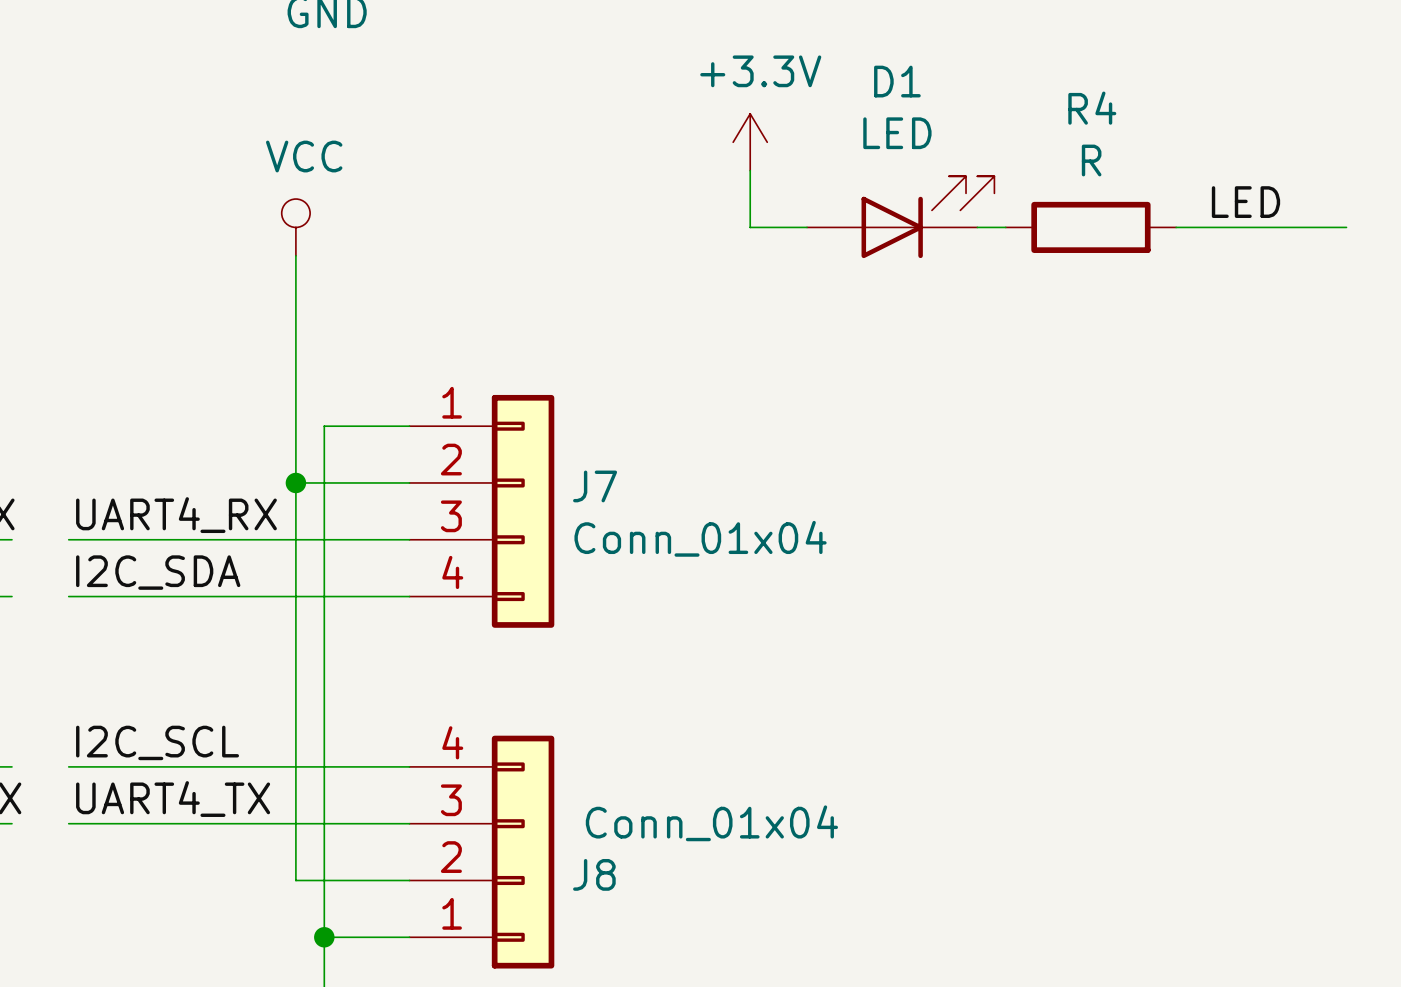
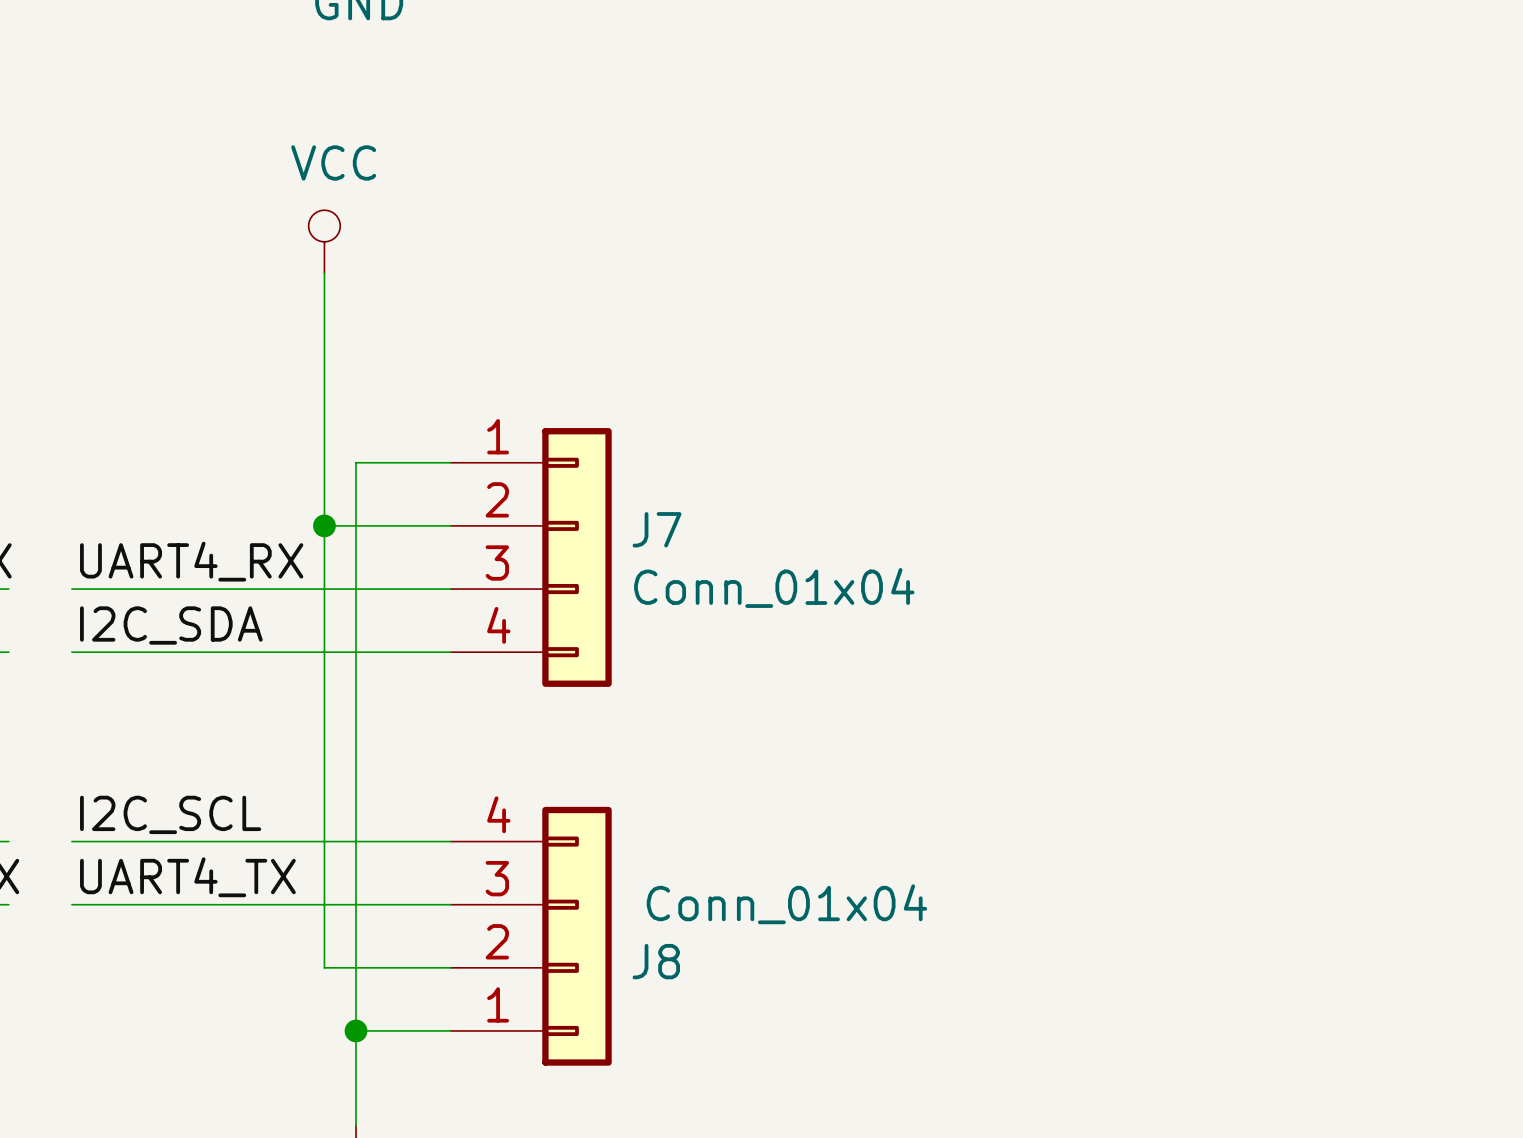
power symbol: +3.3V (750, 142) -> none
wire: (750, 170) (750, 227) (807, 227) -> none
label: LED (1245, 202) -> none
D1: LED (900, 217) -> none
wire: (977, 227) (1005, 227) -> none
R4: R (1090, 227) -> none
wire: (1176, 227) (1346, 227) -> none

